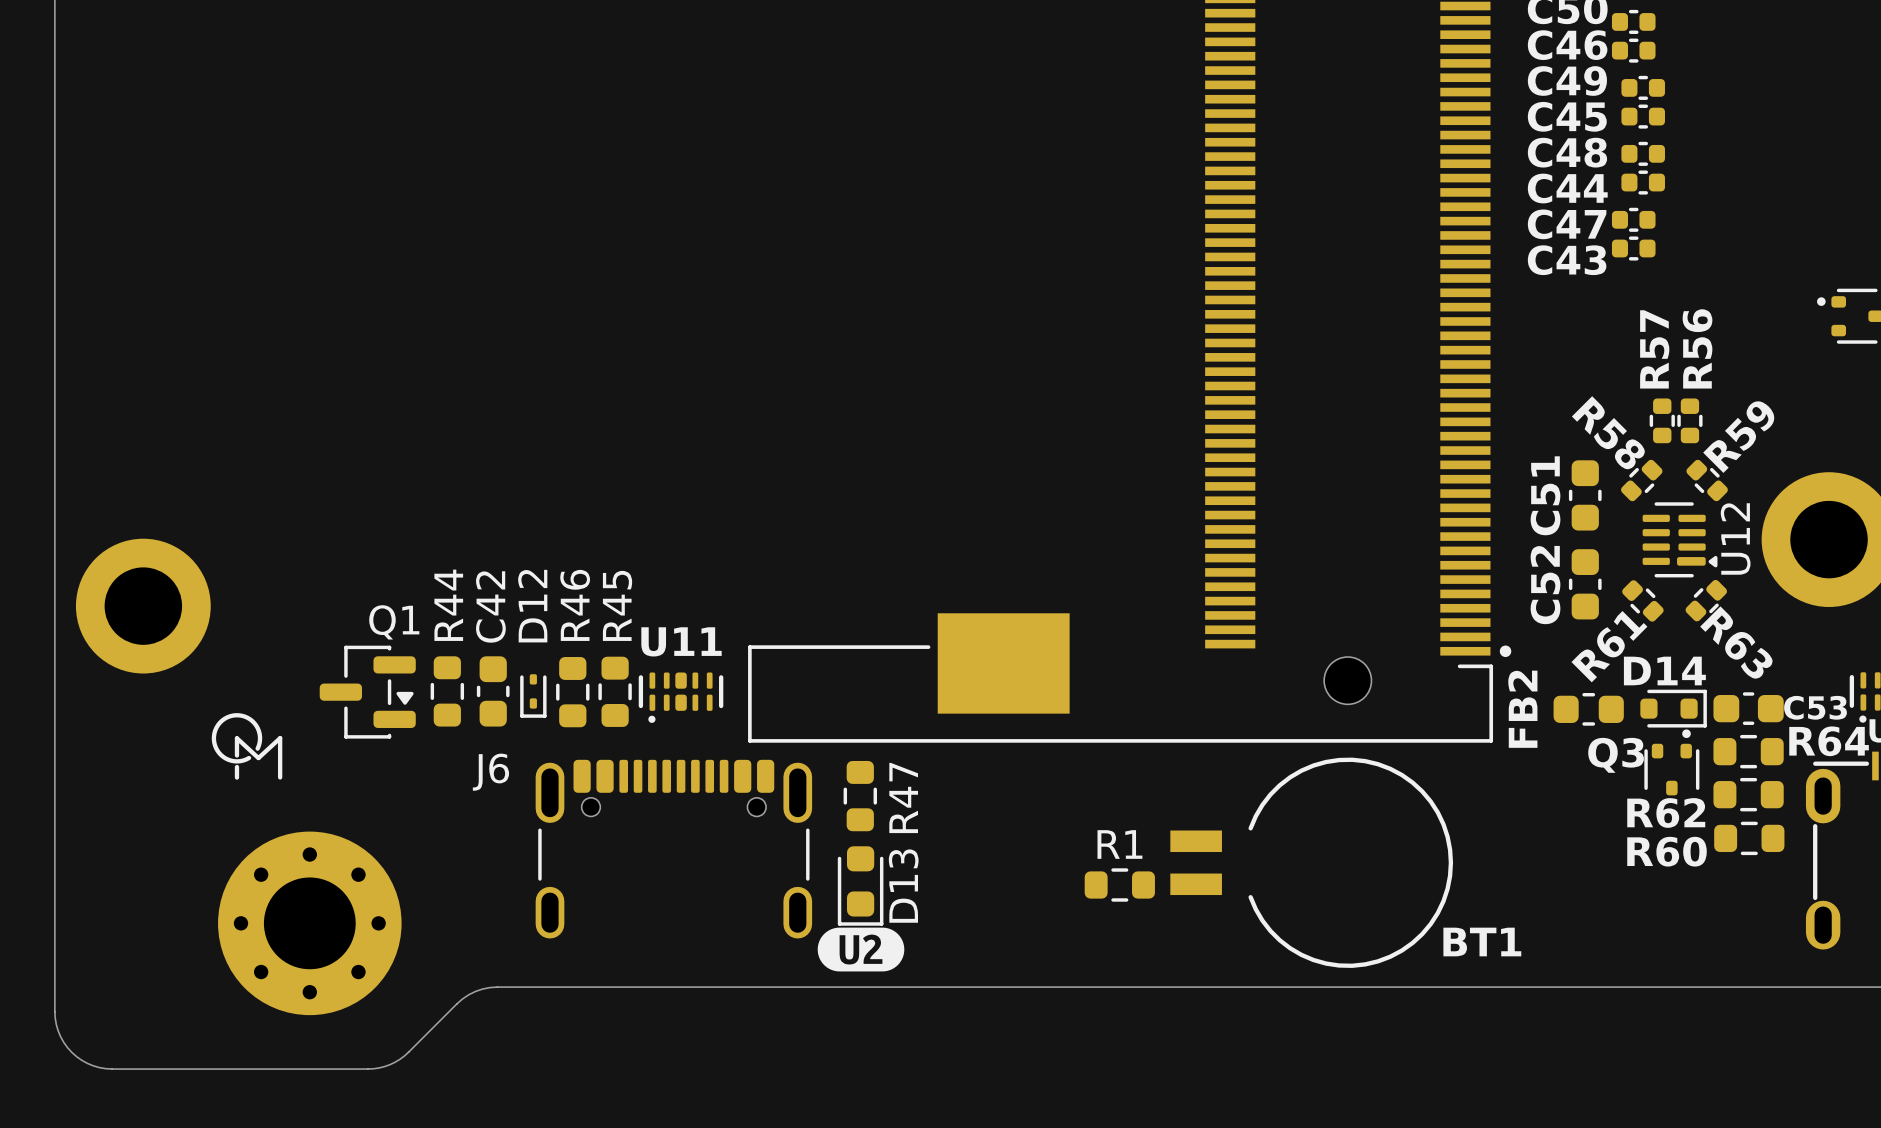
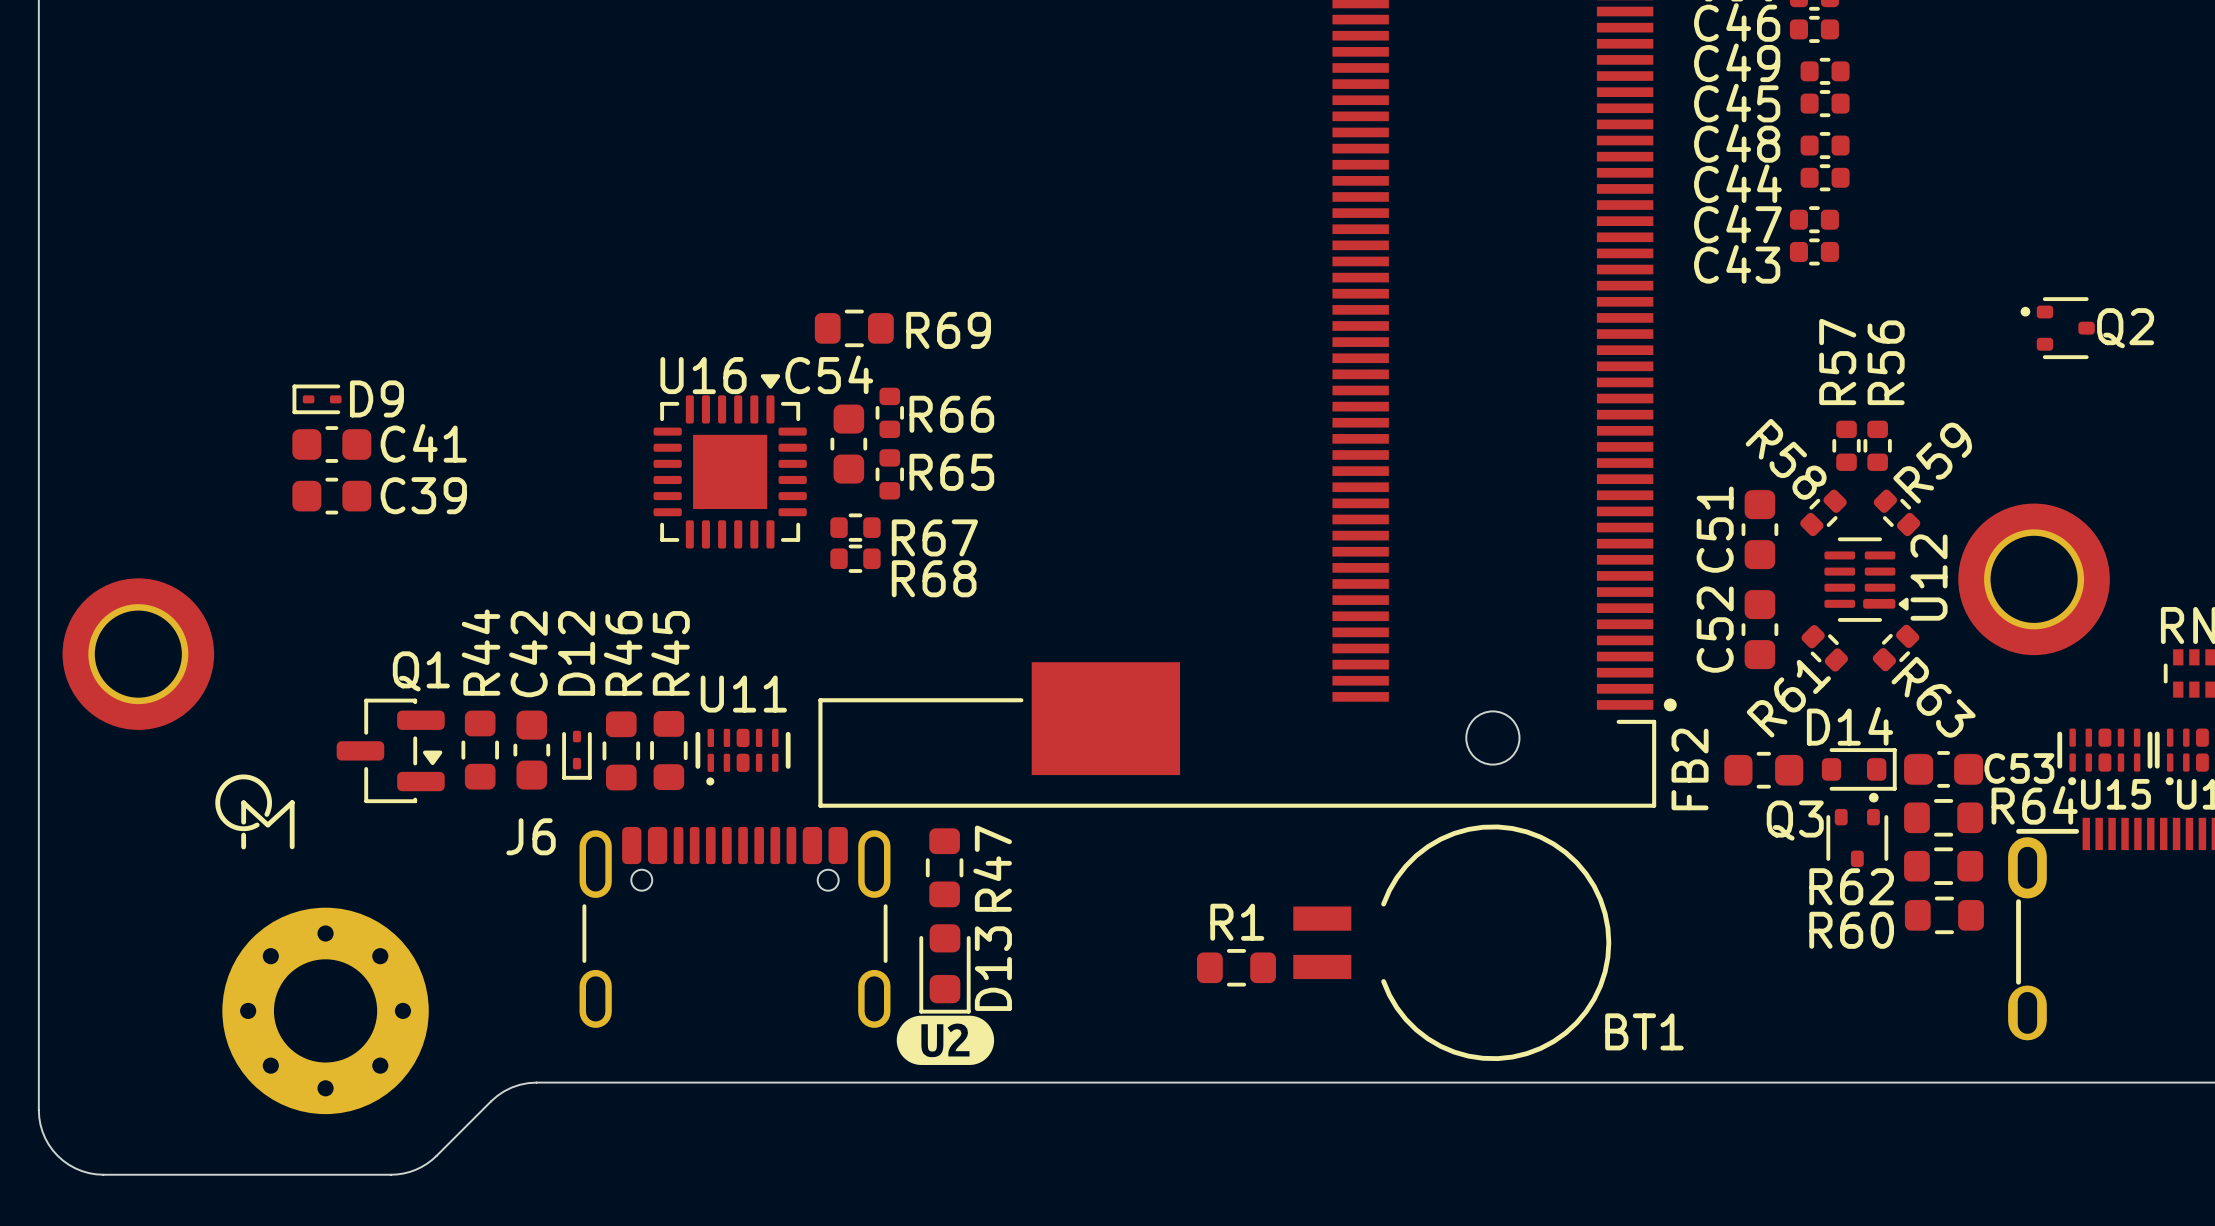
R69: none -> (854, 328)
D9: none -> (317, 399)
R66: none -> (889, 412)
C41: none -> (331, 444)
C54: none -> (848, 444)
U16: none -> (730, 461)
R65: none -> (889, 474)
C39: none -> (331, 496)
R67: none -> (855, 527)
R68: none -> (855, 558)

